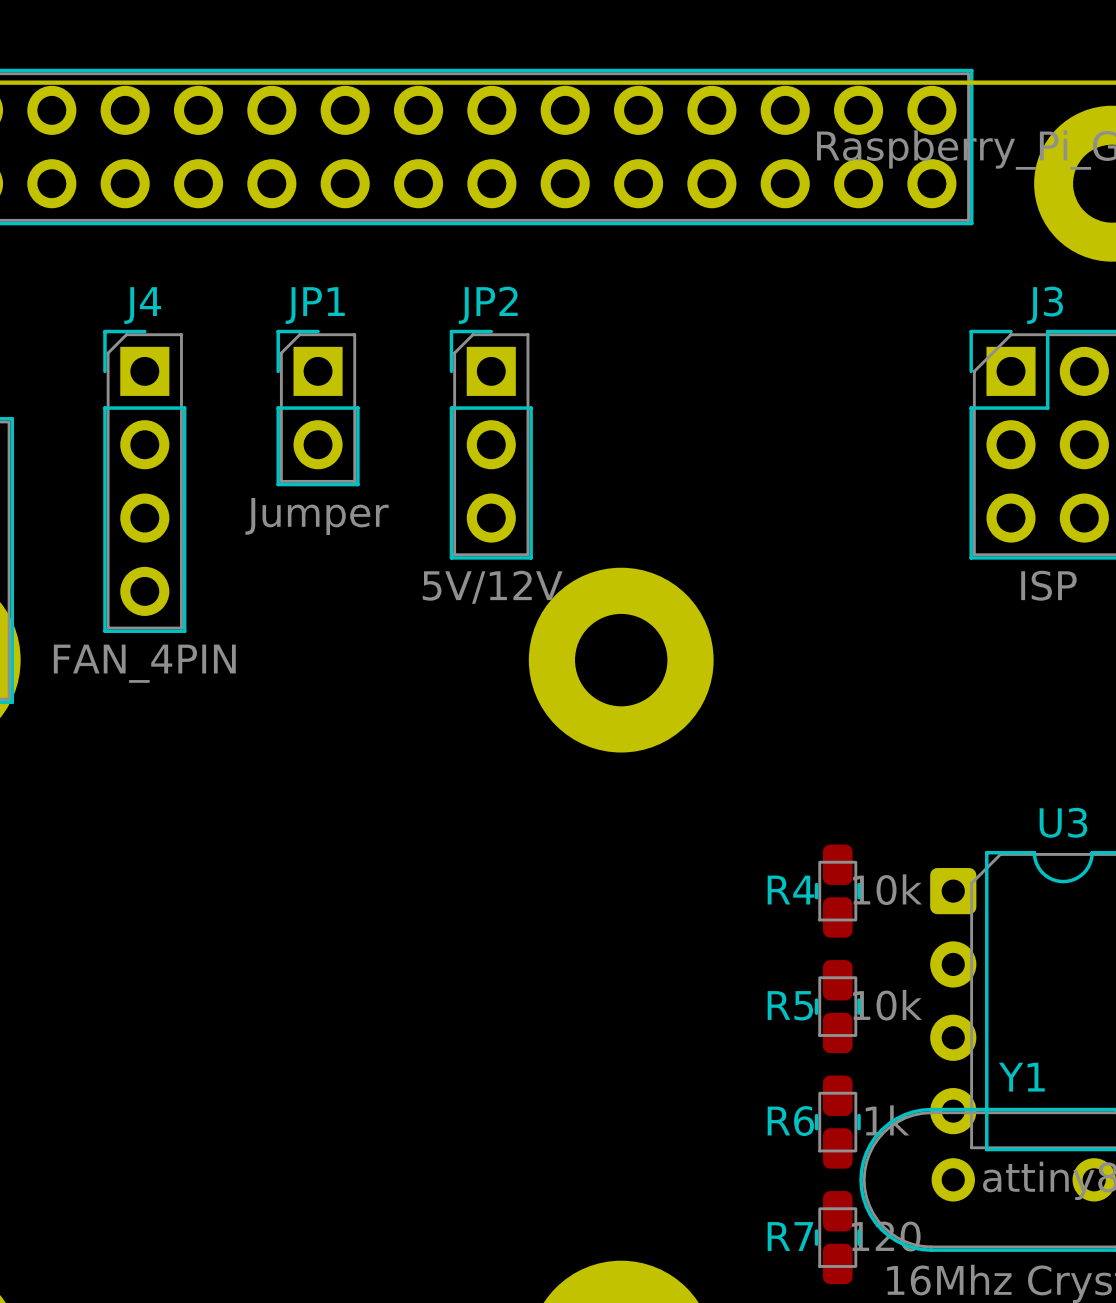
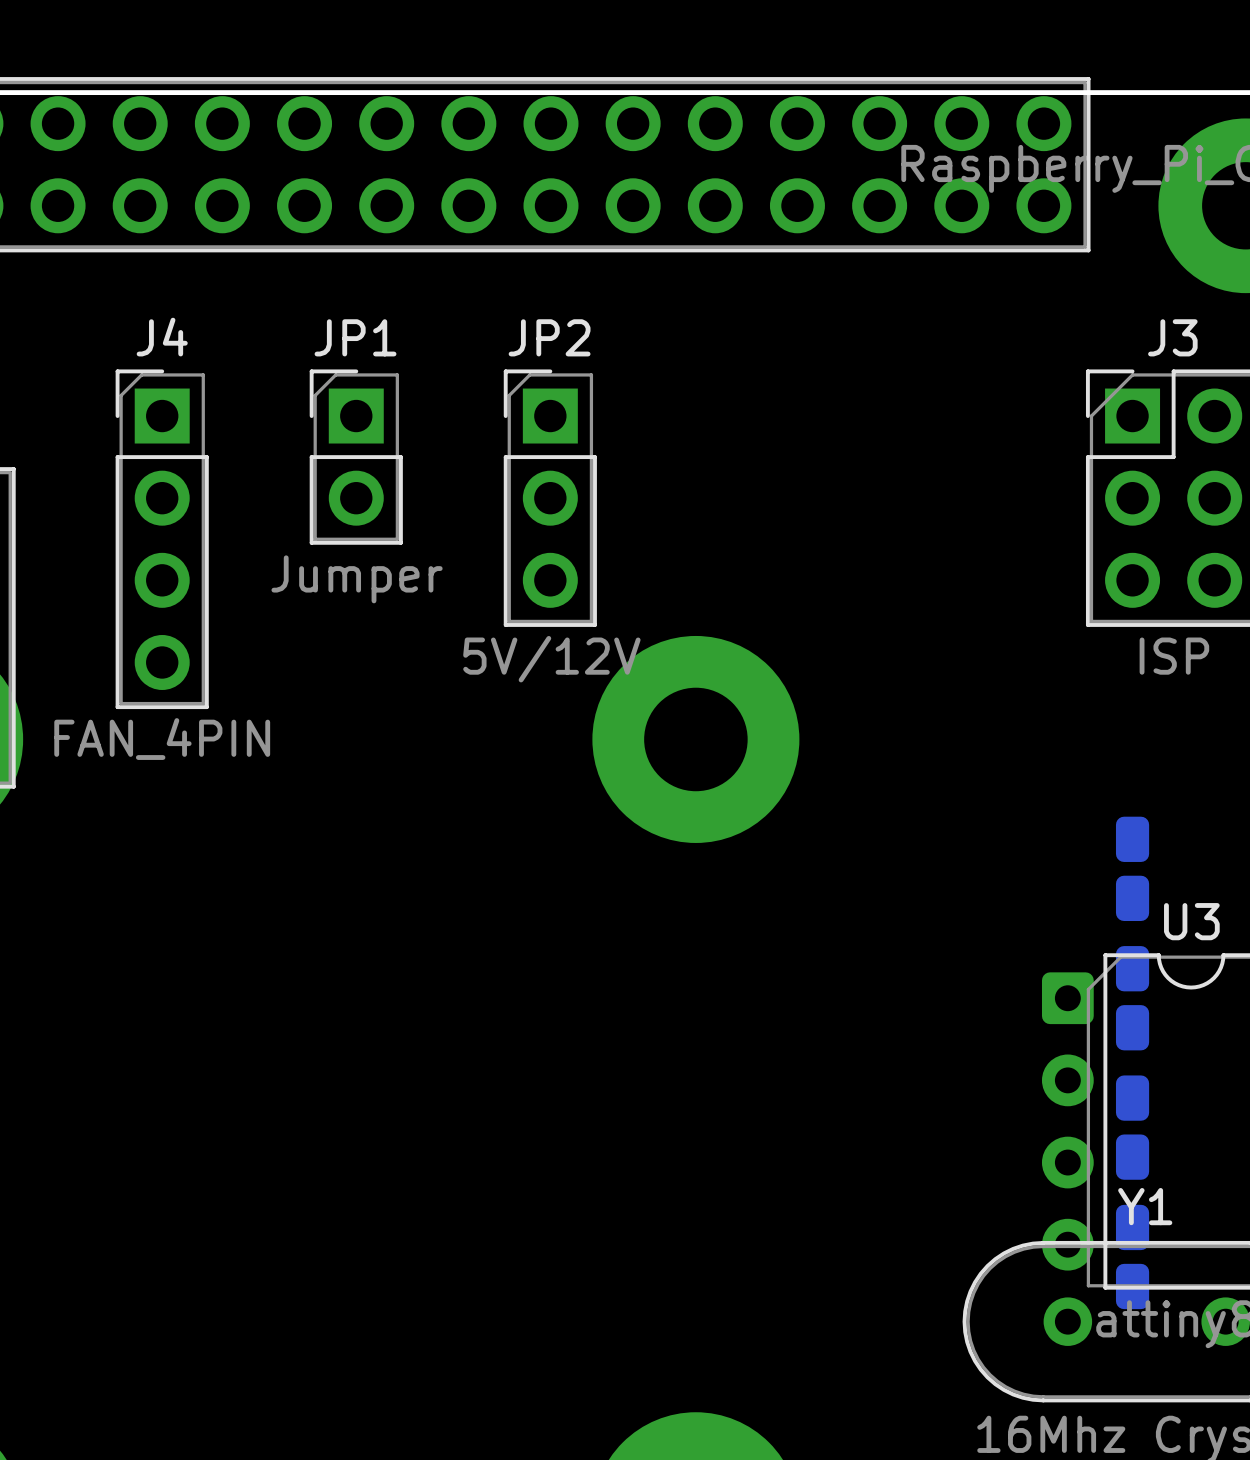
R4 side: top (837, 891) -> bottom (1132, 868)
R5 side: top (837, 1006) -> bottom (1132, 998)
R6 side: top (837, 1122) -> bottom (1132, 1127)
R7 side: top (837, 1237) -> bottom (1132, 1256)

